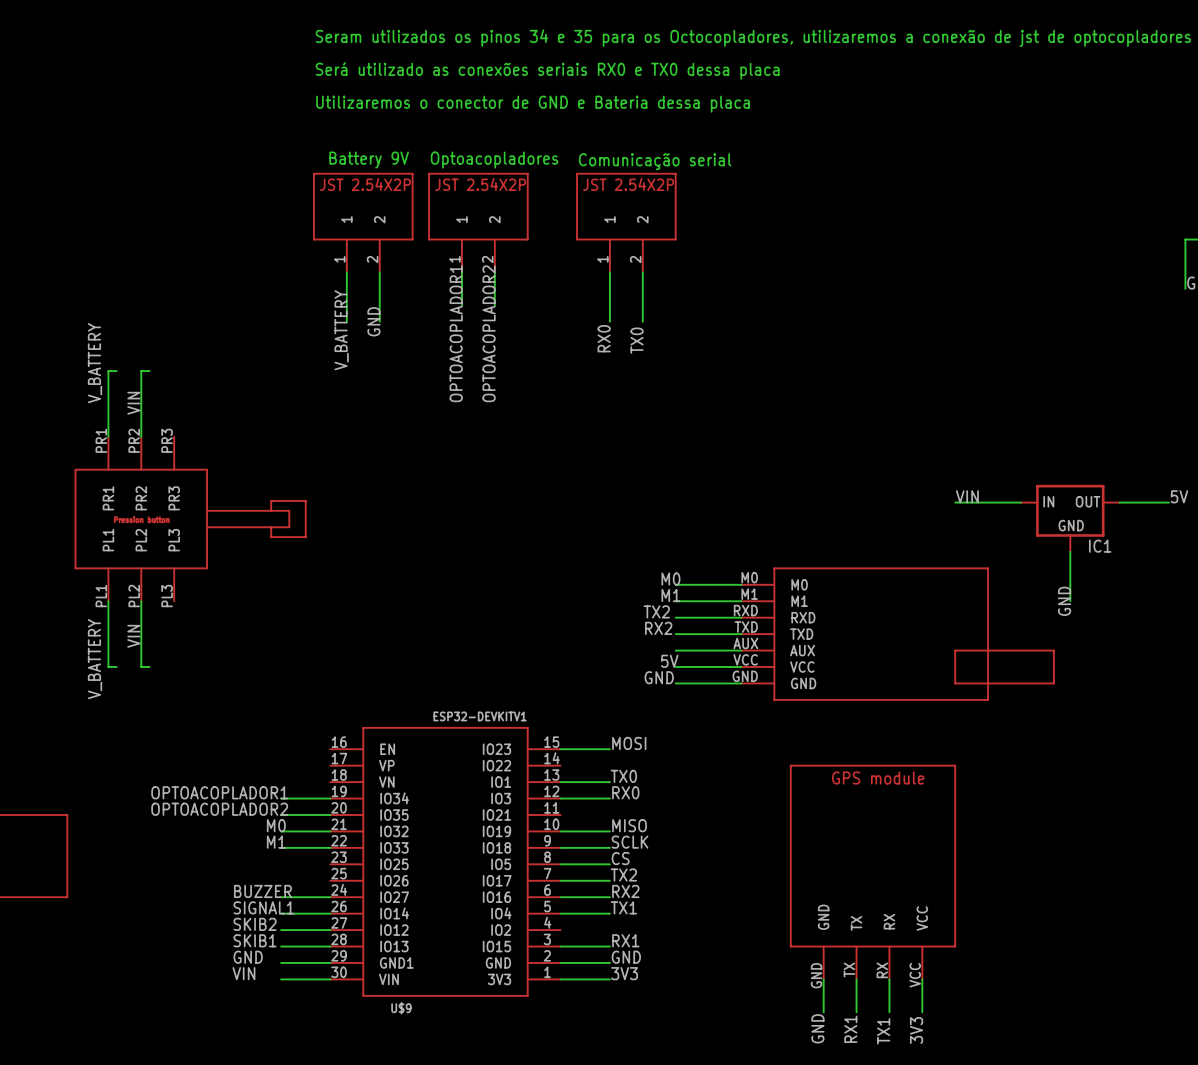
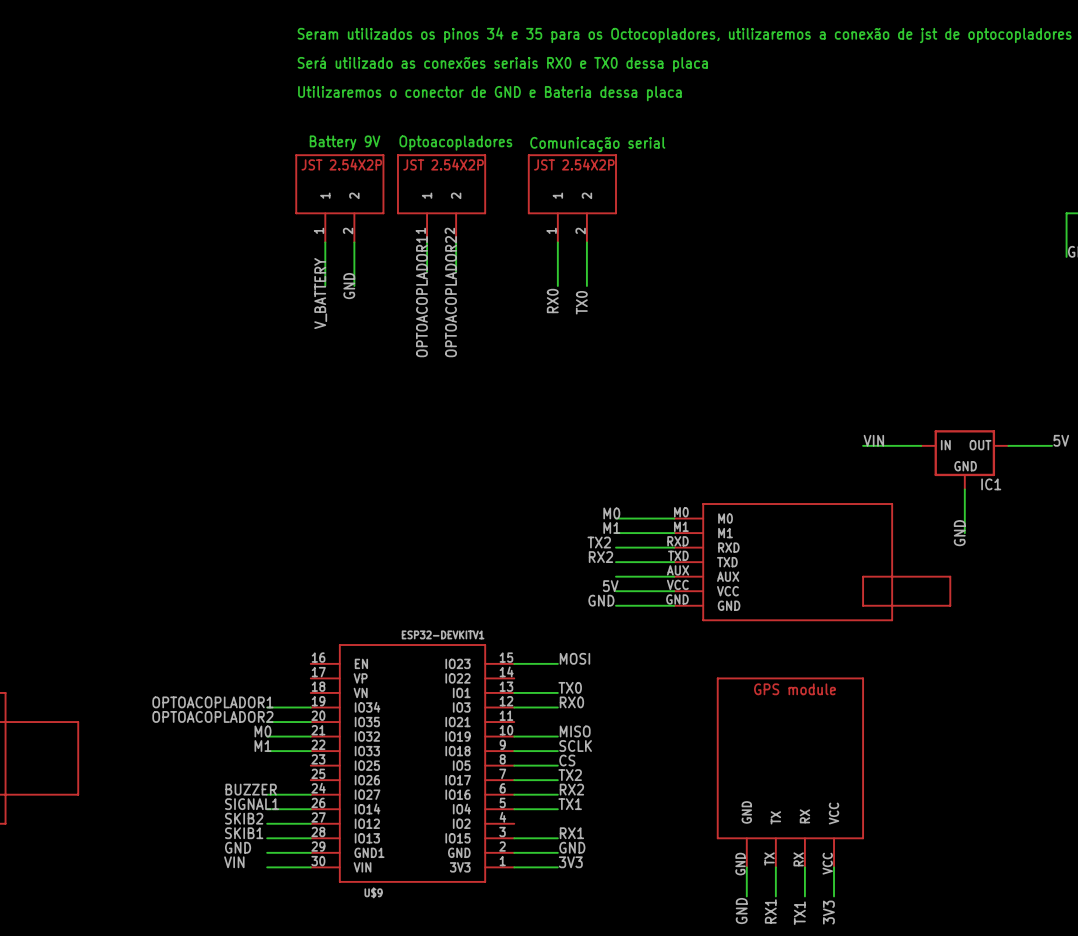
label: V_BATTERY (95, 363) -> none
wire: (116, 371) (108, 371) (108, 436) -> none
wire: (149, 371) (141, 371) (141, 436) -> none
label: VIN (133, 403) -> none
part: (190, 519) -> none
wire: (108, 601) (108, 667) (116, 667) -> none
wire: (141, 601) (141, 667) (149, 667) -> none
label: VIN (133, 636) -> none
label: V_BATTERY (95, 659) -> none

